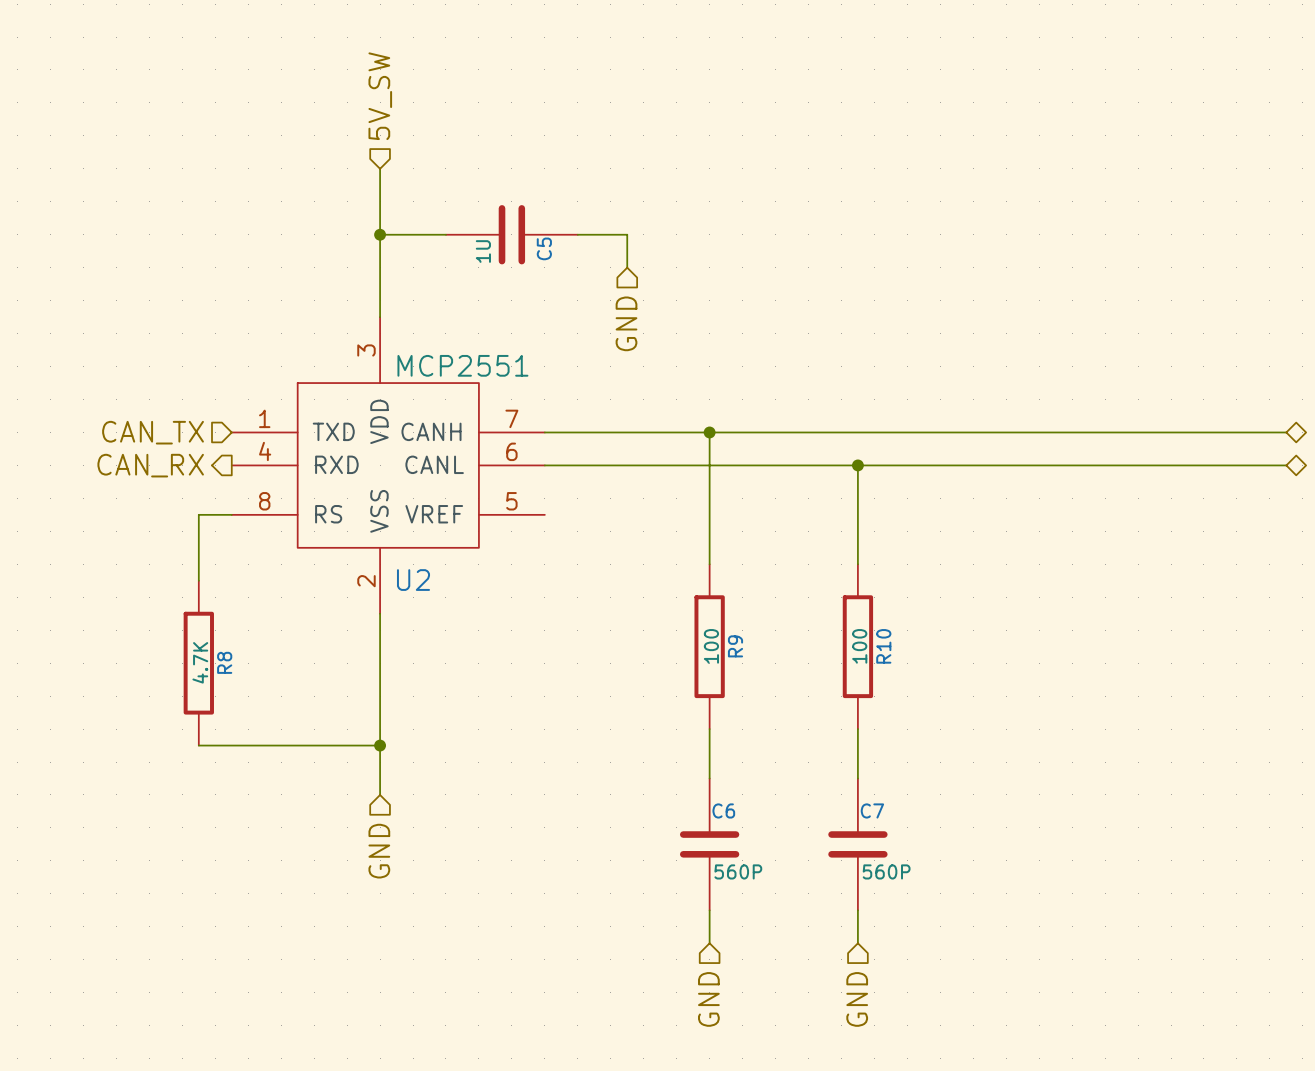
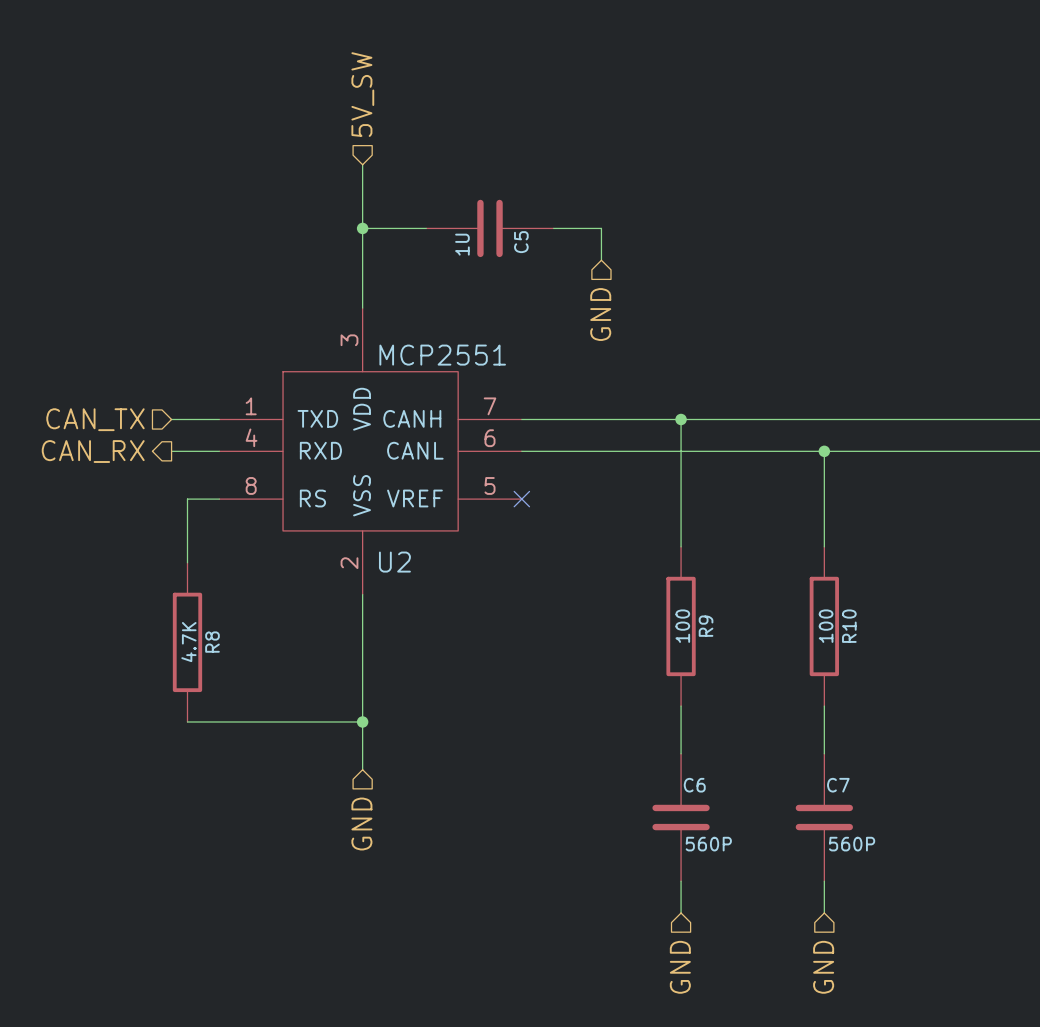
hierarchical label position: CAN_TX (153, 432) -> CAN_TX (95, 419)
wire: none -> (171, 419) (219, 419)
hierarchical label position: CAN_RX (150, 465) -> CAN_RX (93, 451)
wire: none -> (171, 451) (219, 451)
no-connect mark: none -> (521, 499)

